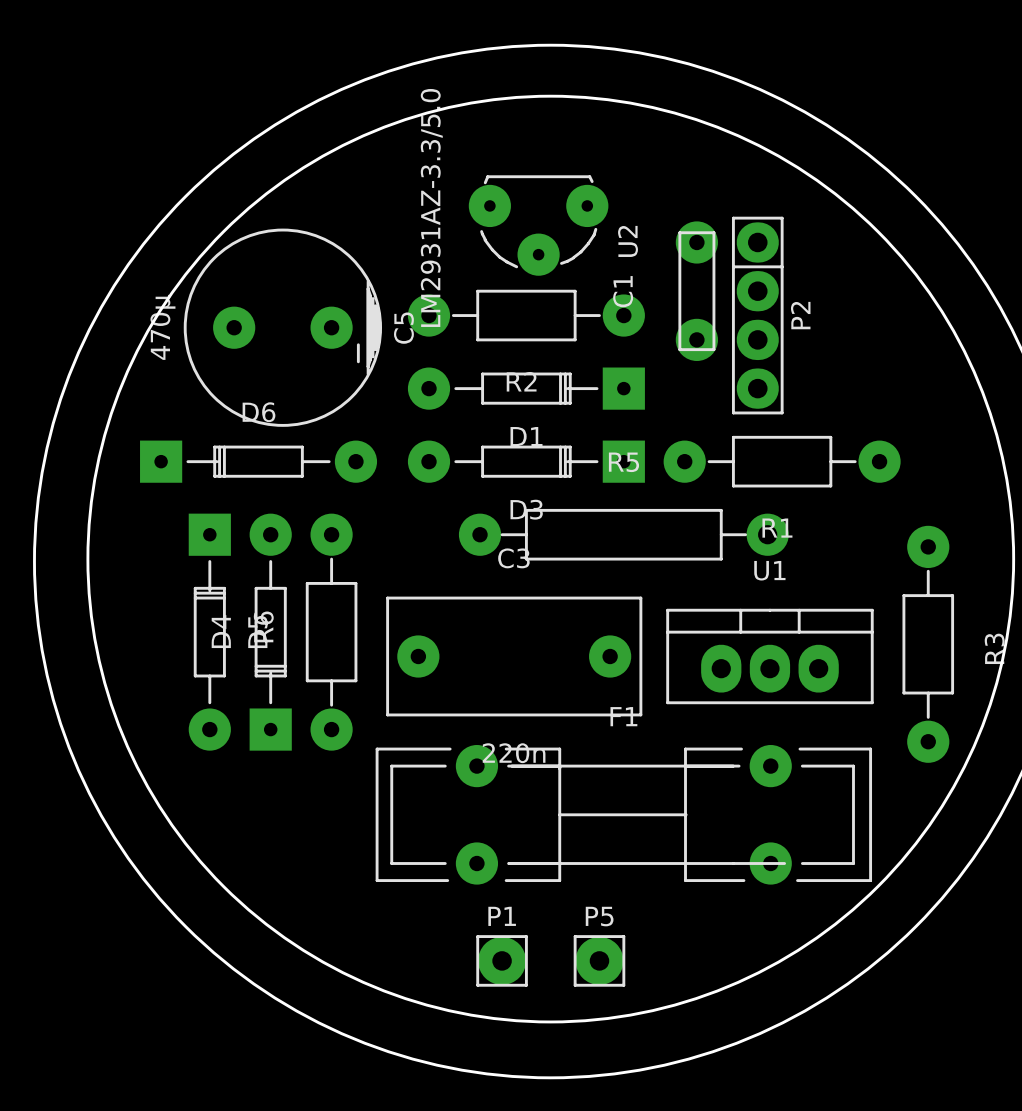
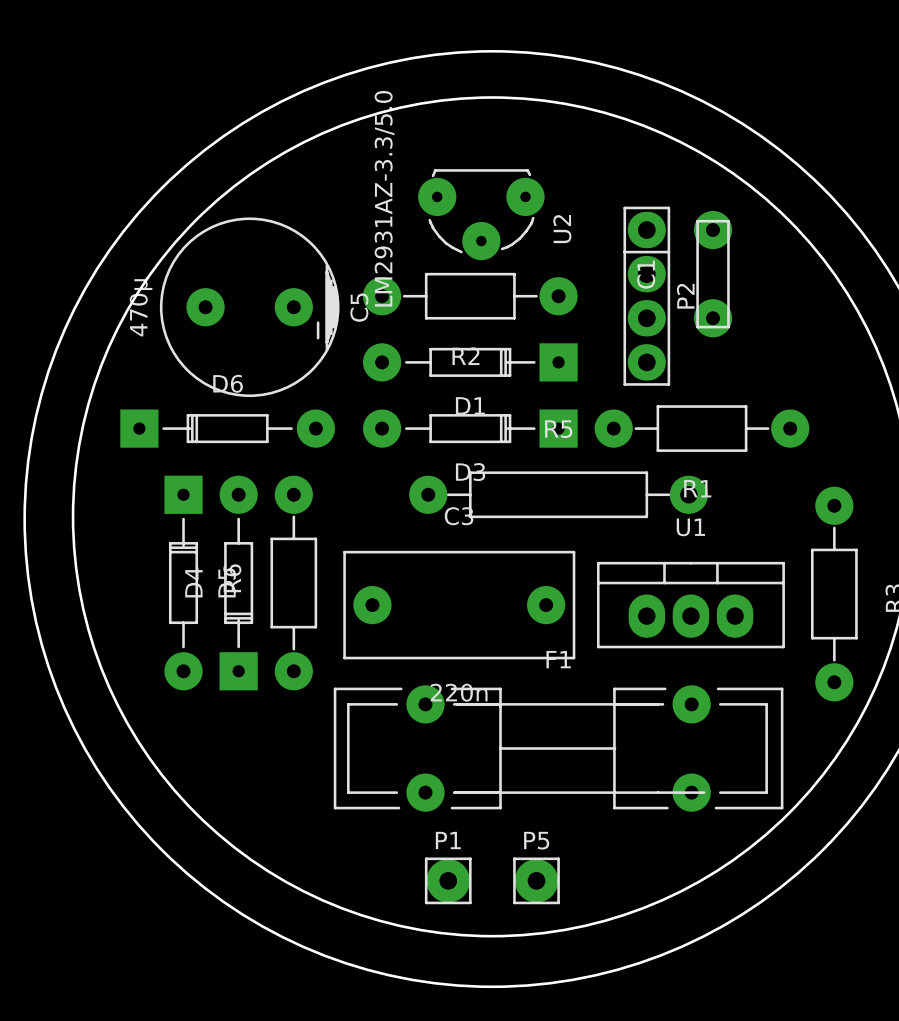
C1 position: (696, 291) -> (713, 274)
P2 position: (757, 315) -> (646, 296)

